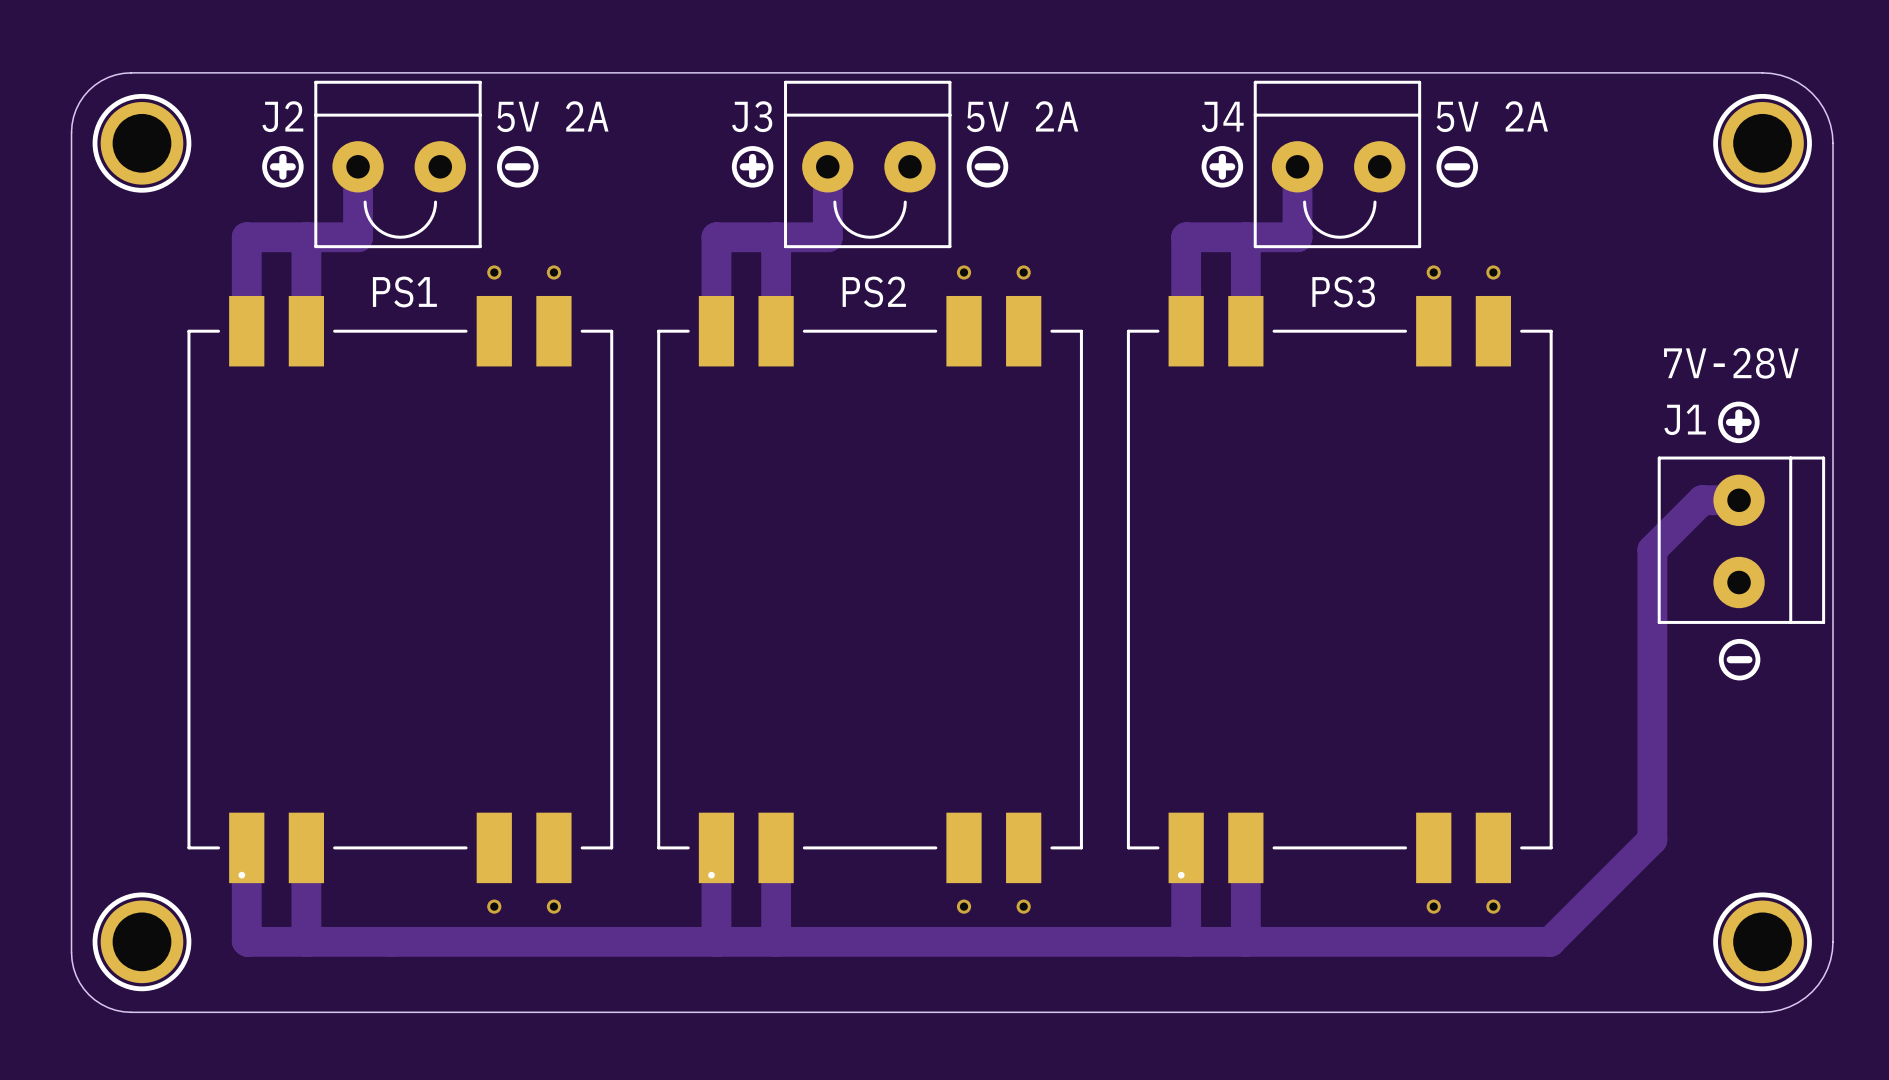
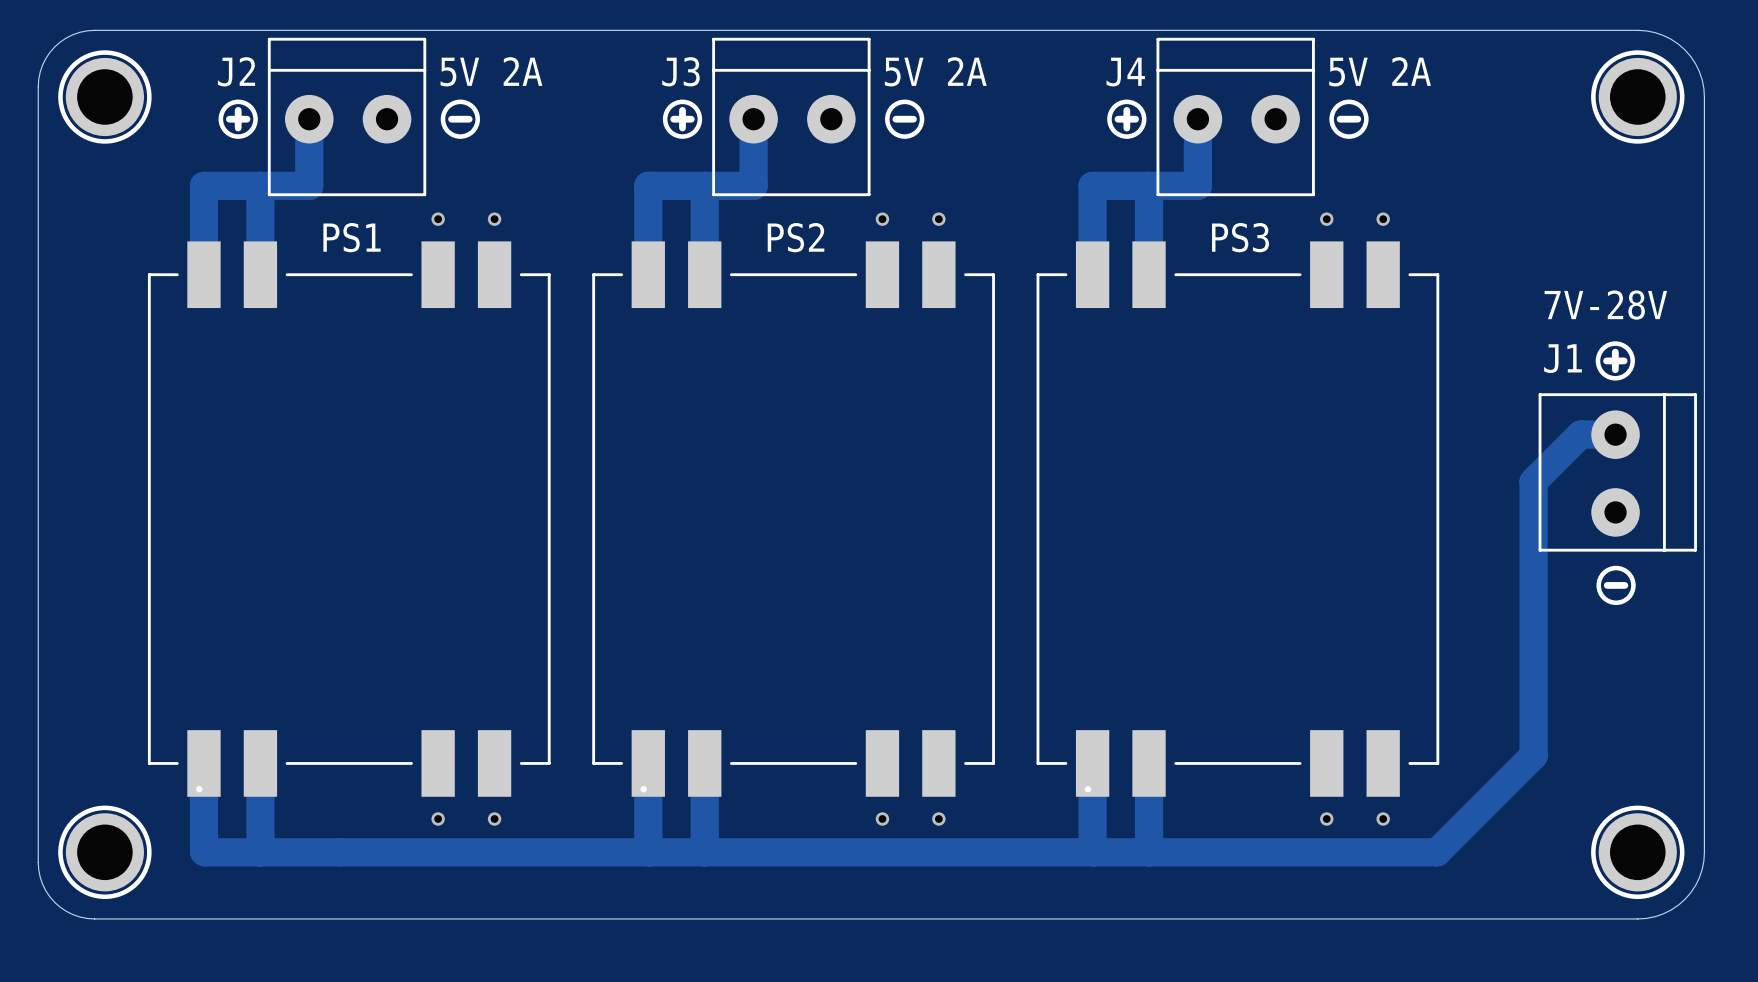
line: (365, 202) (367, 215) (375, 226) (386, 234) (400, 237) (413, 234) (425, 226) (432, 215) (435, 202) -> none
line: (834, 202) (837, 215) (845, 226) (856, 234) (870, 237) (883, 234) (894, 226) (902, 215) (905, 202) -> none
line: (1304, 202) (1307, 215) (1314, 226) (1326, 234) (1339, 237) (1353, 234) (1364, 226) (1372, 215) (1375, 202) -> none

